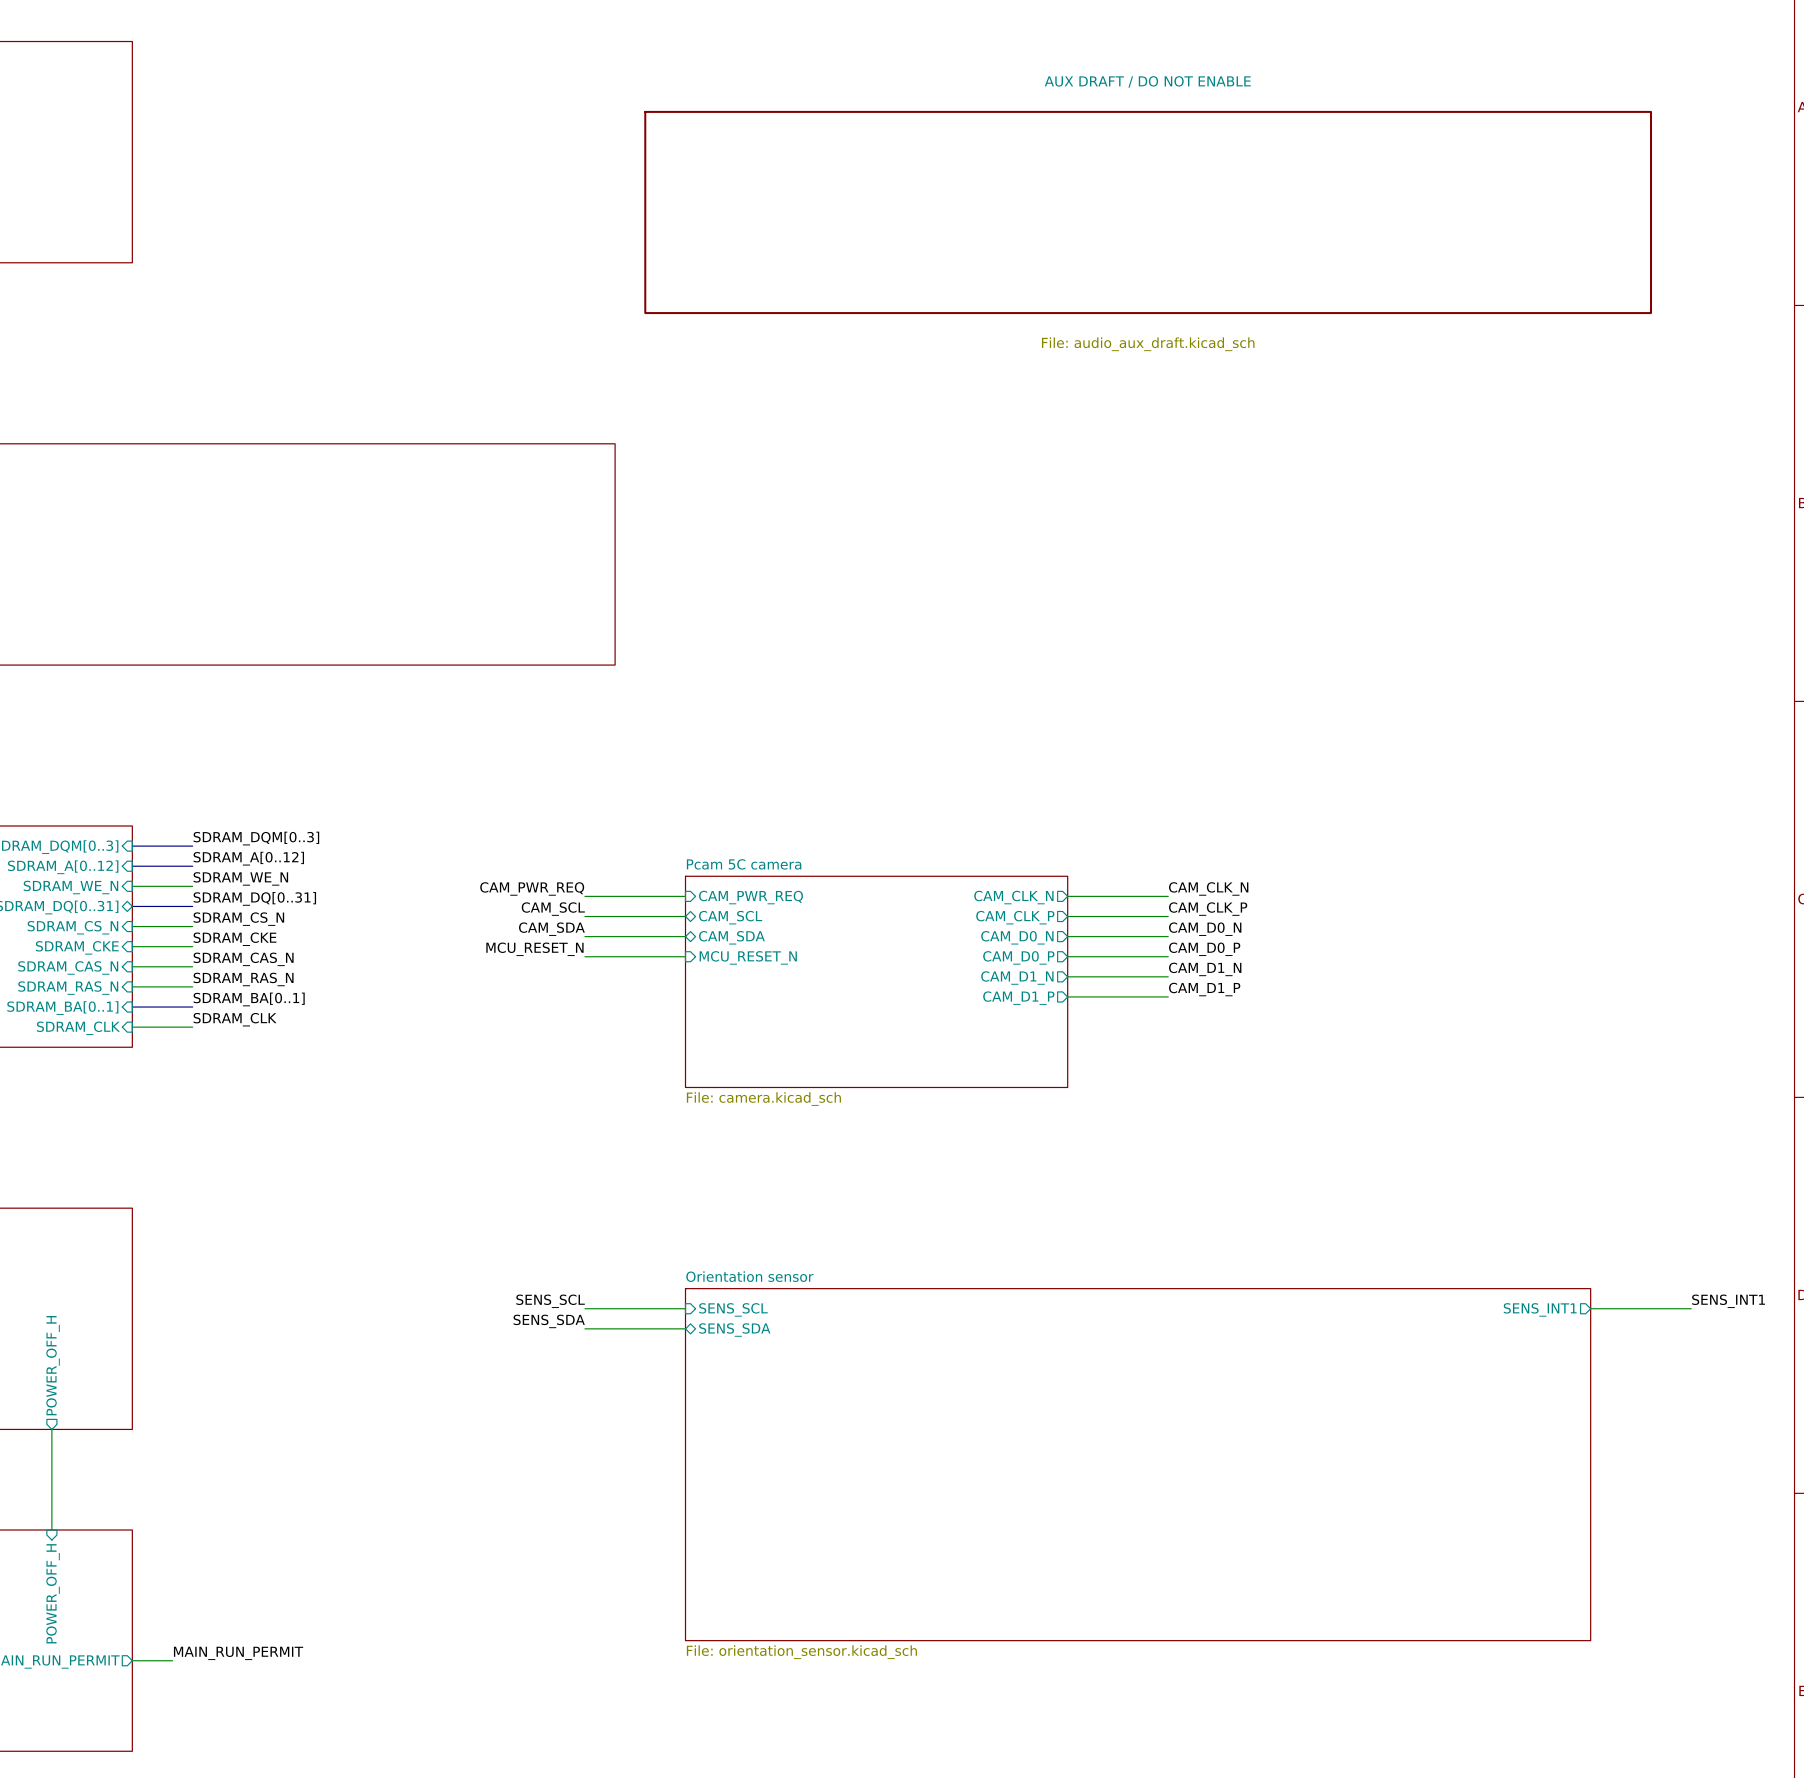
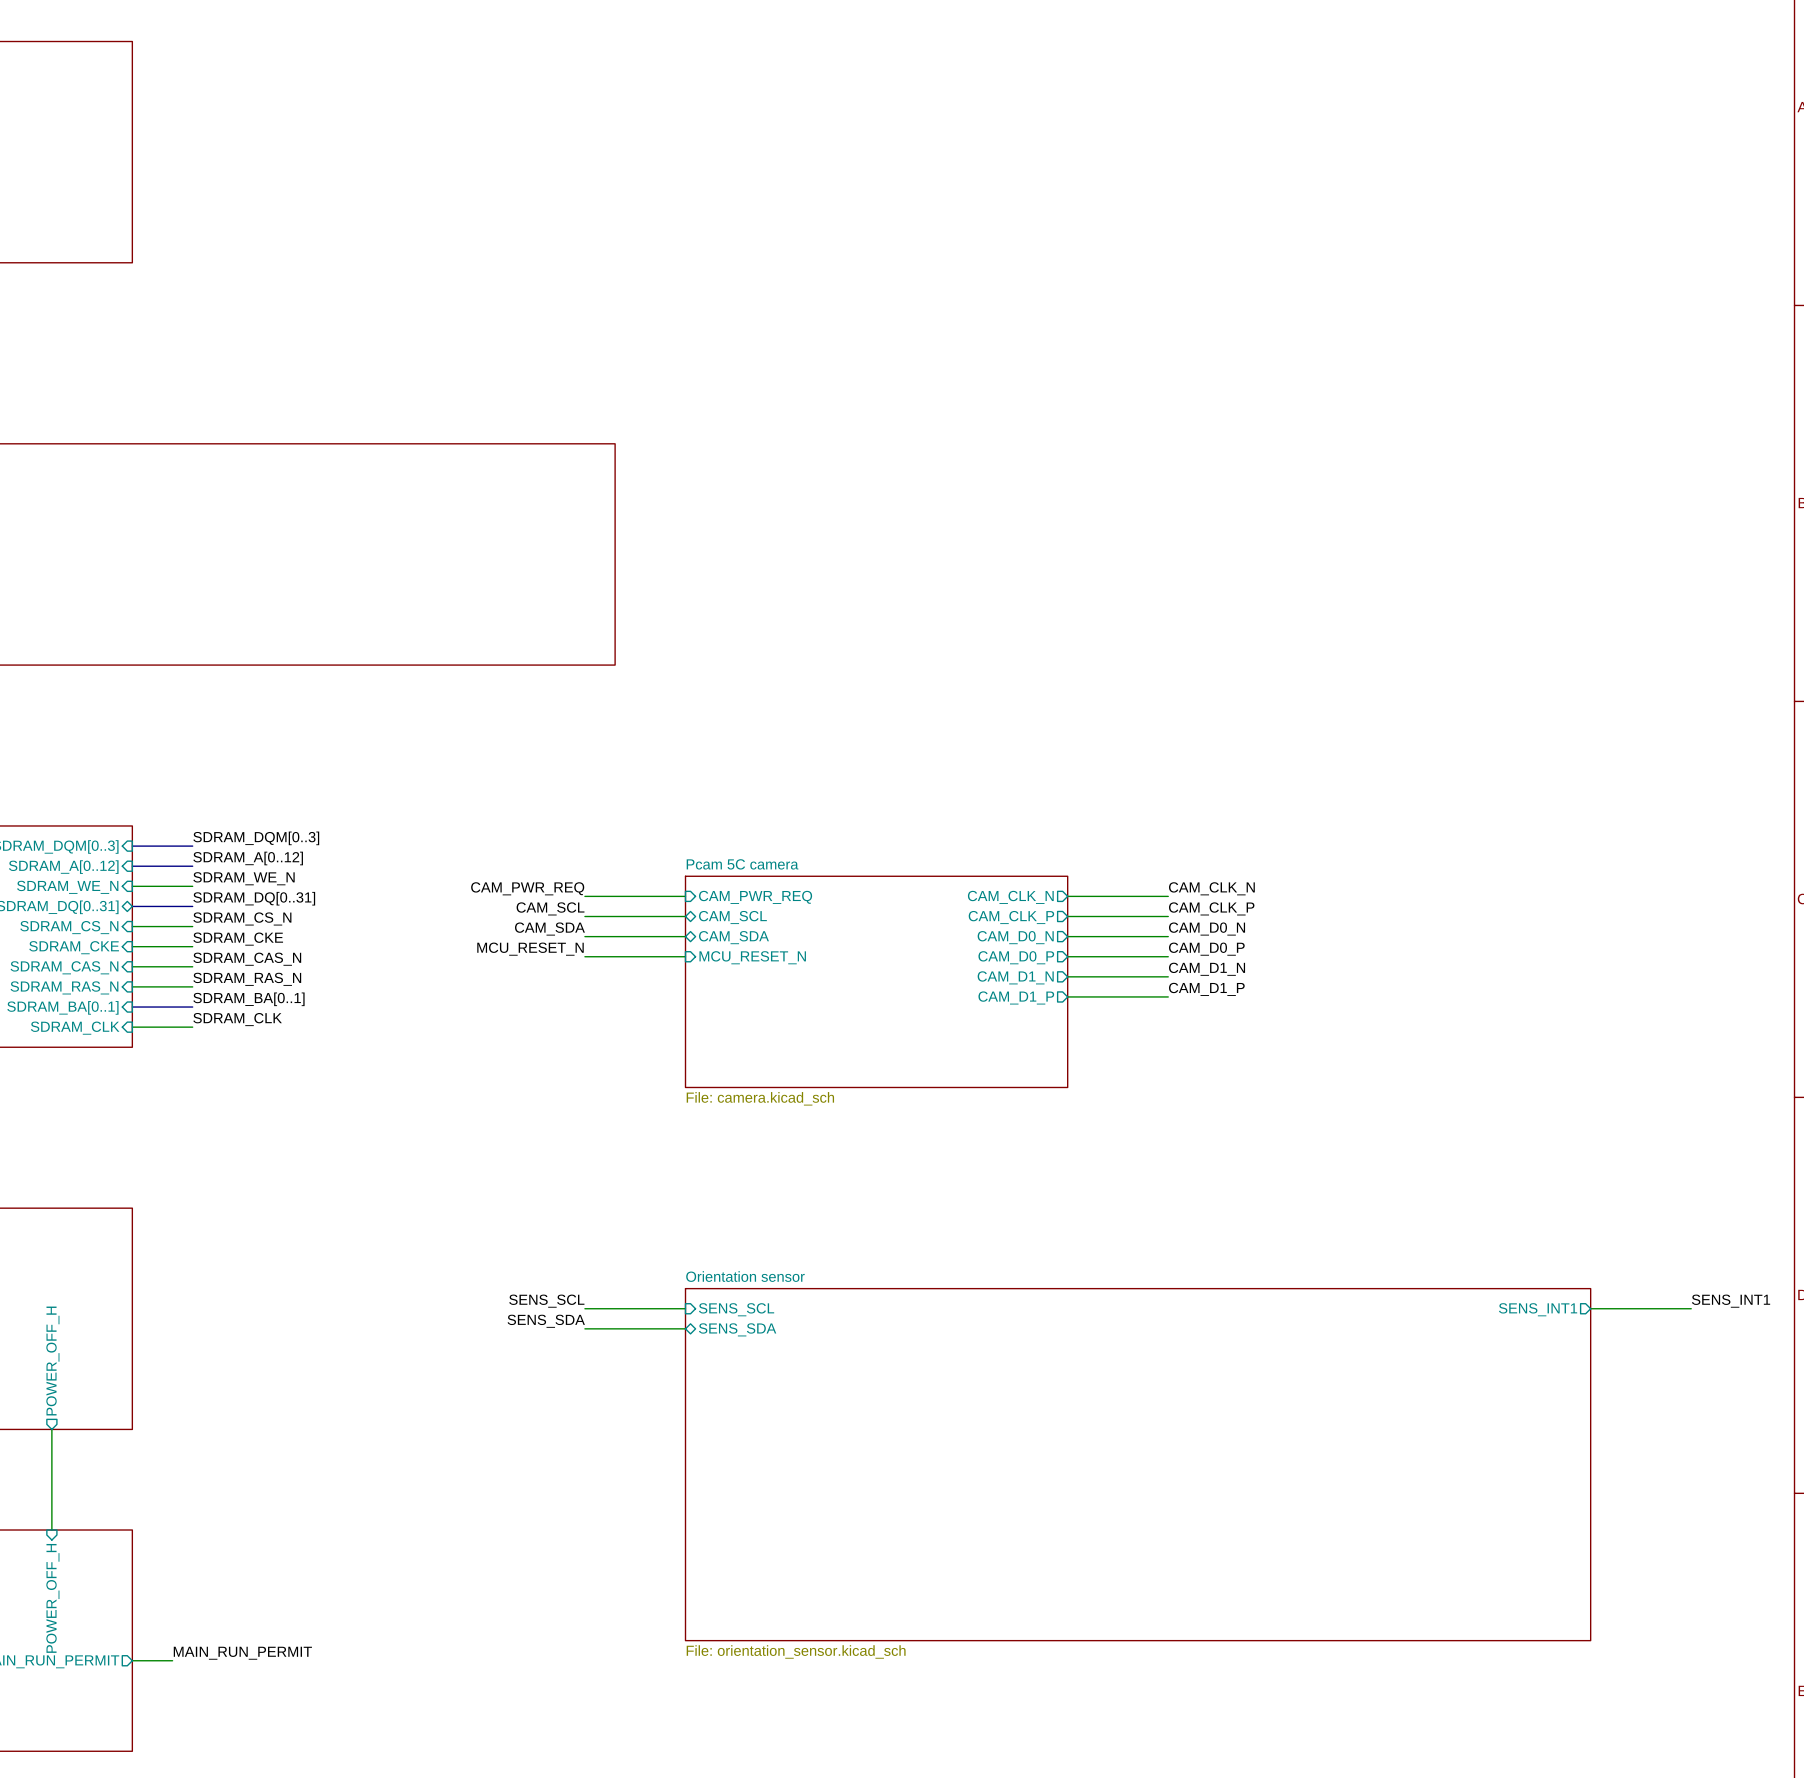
sheet AUX DRAFT / DO NOT ENABLE: File: audio_aux_draft.kicad_sch (1148, 212) -> none

